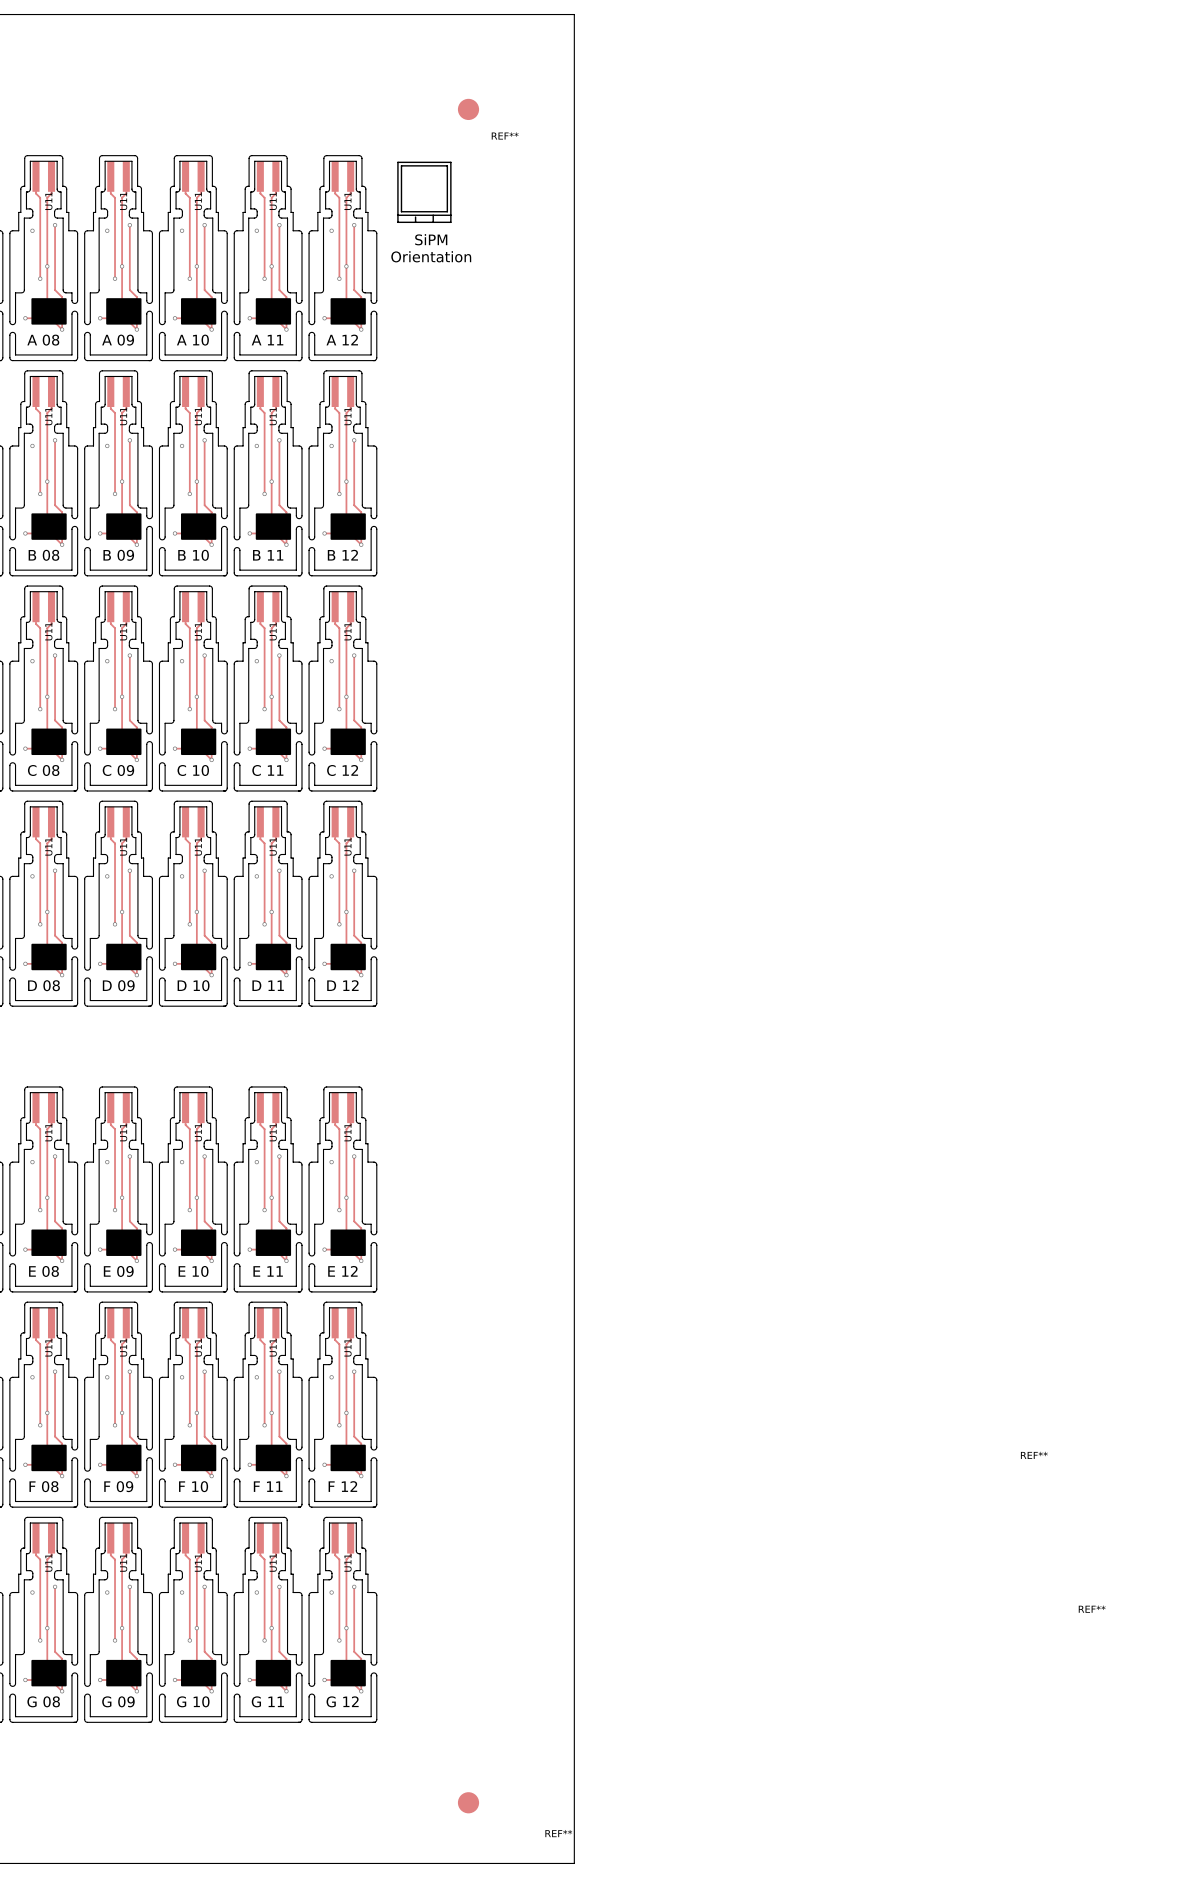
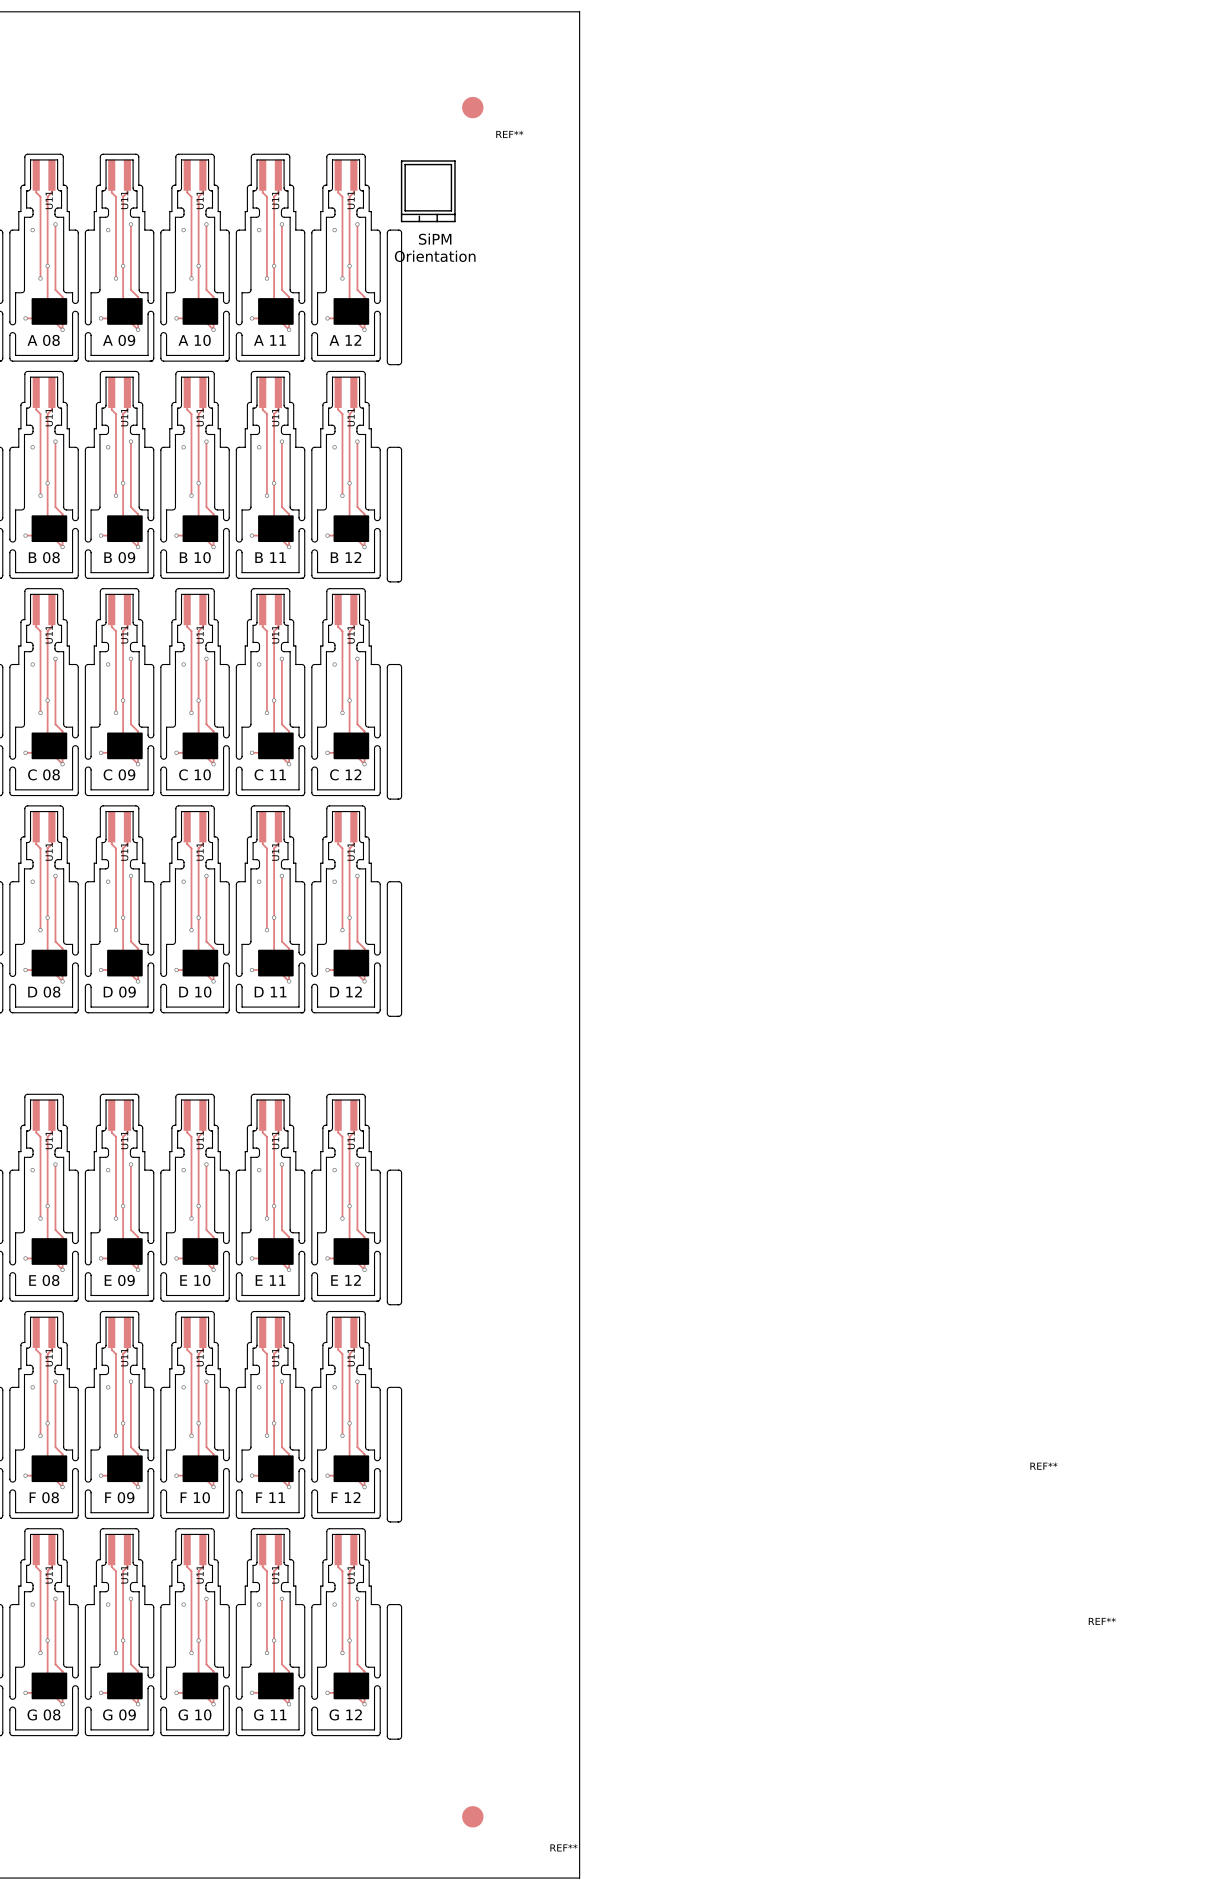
board edge: none -> (398, 364) (401, 361) (401, 232) (399, 230) (390, 230) (387, 232) (387, 361) (389, 364) (398, 364)
board edge: none -> (398, 581) (401, 579) (401, 450) (399, 447) (390, 447) (387, 450) (387, 579) (389, 581) (398, 581)
board edge: none -> (398, 799) (401, 796) (401, 667) (399, 664) (390, 664) (387, 667) (387, 796) (389, 799) (398, 799)
board edge: none -> (398, 1016) (401, 1013) (401, 884) (399, 881) (390, 881) (387, 884) (387, 1013) (389, 1016) (398, 1016)
board edge: none -> (398, 1304) (401, 1301) (401, 1172) (399, 1170) (390, 1170) (387, 1172) (387, 1301) (389, 1304) (398, 1304)
board edge: none -> (398, 1521) (401, 1519) (401, 1390) (399, 1387) (390, 1387) (387, 1390) (387, 1519) (389, 1521) (398, 1521)
board edge: none -> (398, 1739) (401, 1736) (401, 1607) (399, 1604) (390, 1604) (387, 1607) (387, 1736) (389, 1739) (398, 1739)

